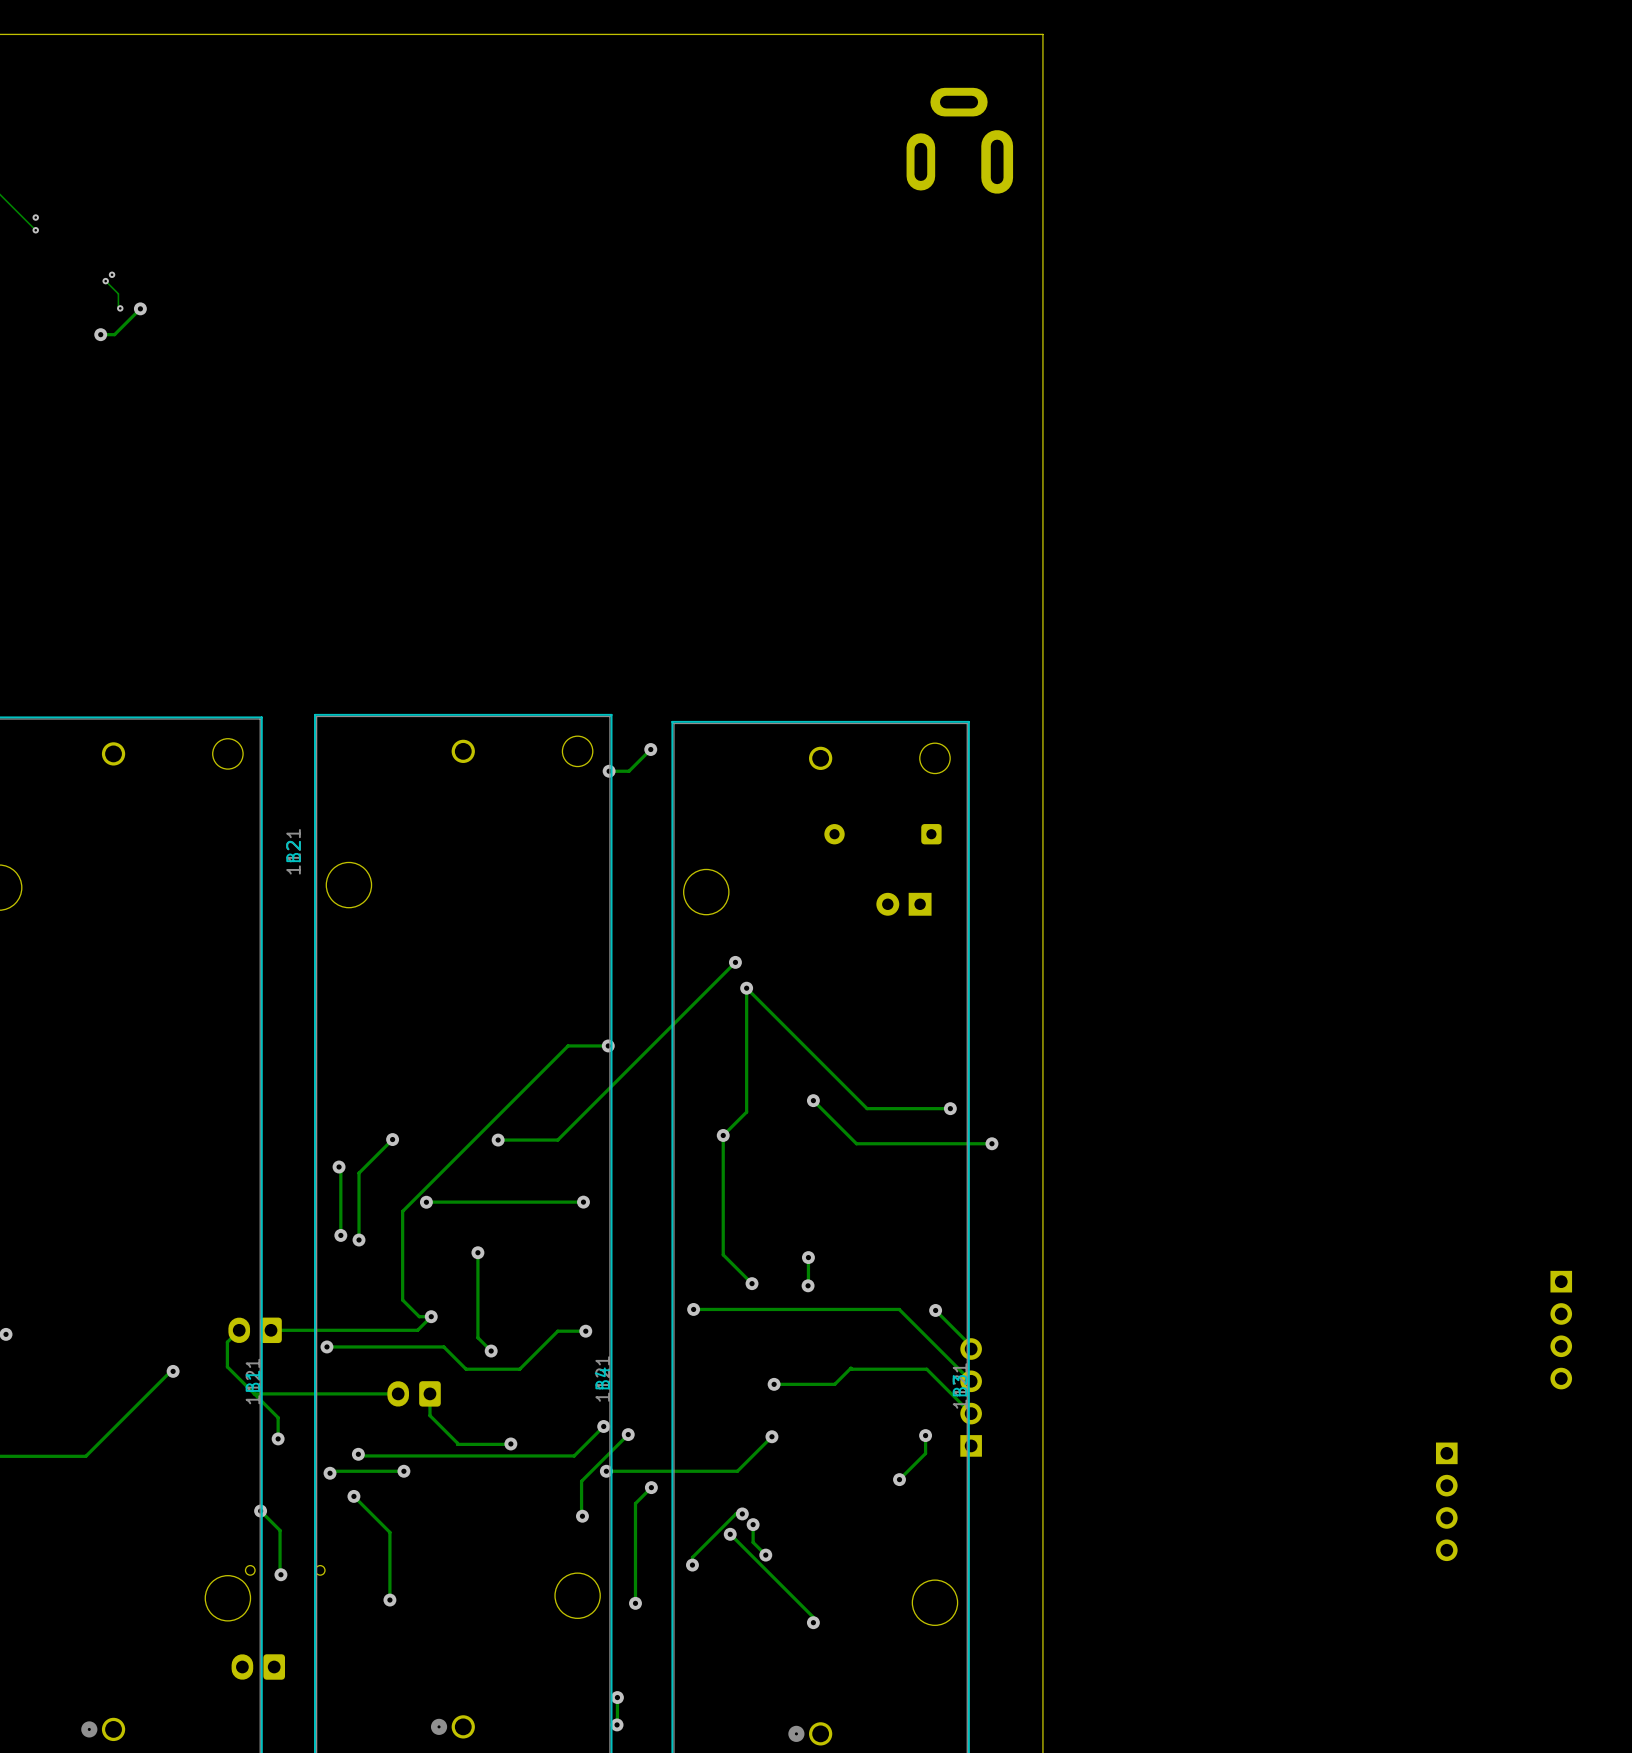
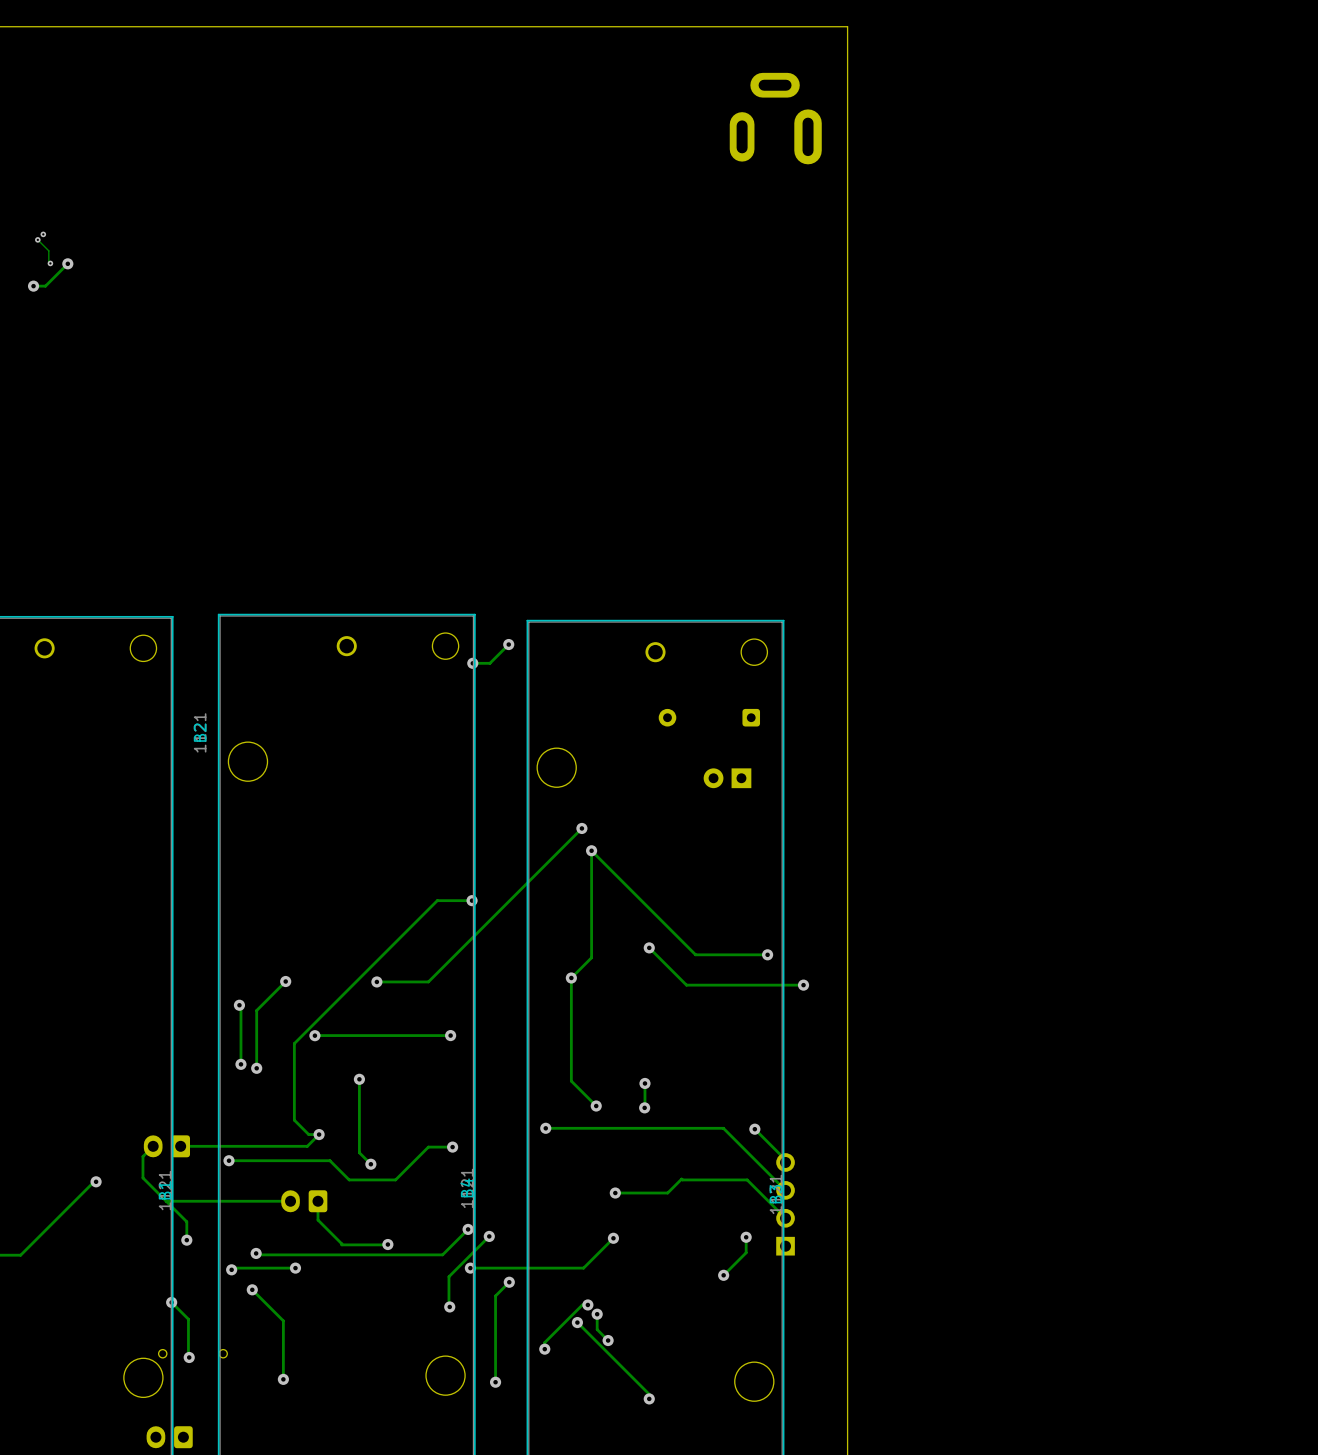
part: (1561, 1330) -> none
part: (1446, 1501) -> none

